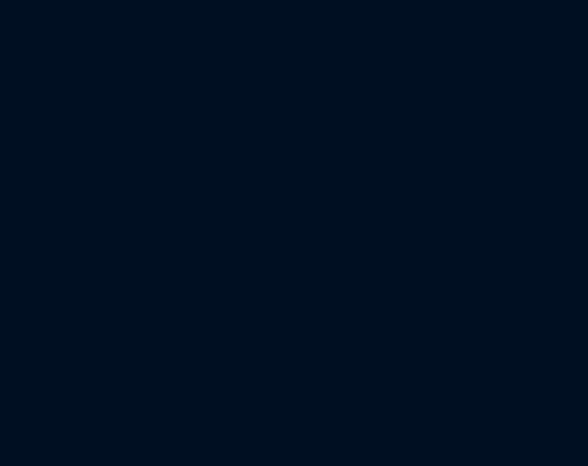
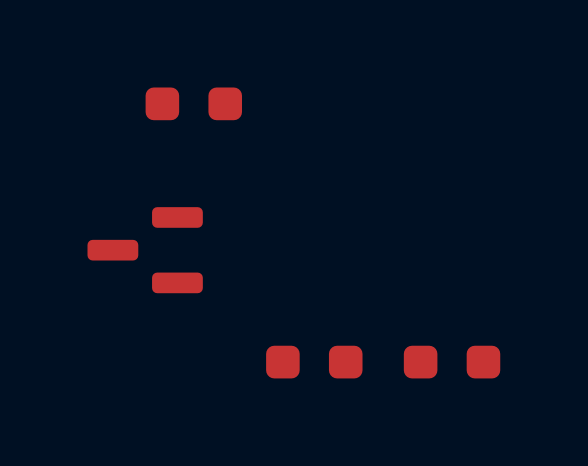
part: none -> (193, 103)
part: none -> (145, 250)
part: none -> (314, 362)
part: none -> (452, 362)

